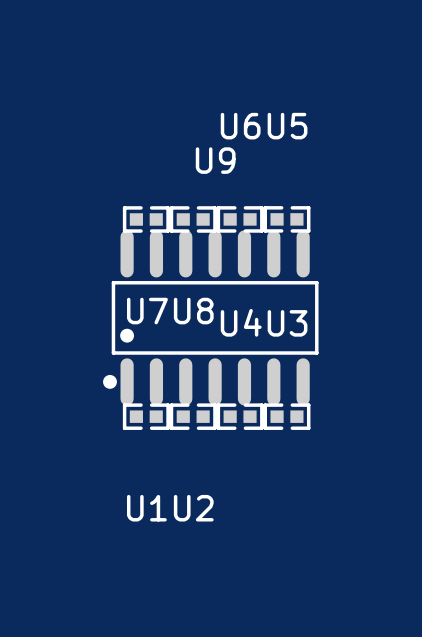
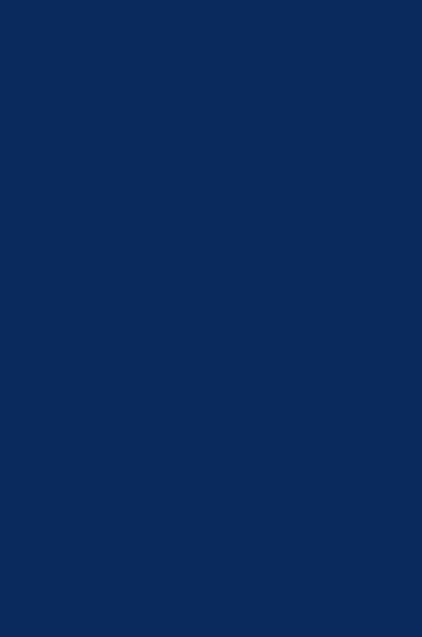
U7: (146, 219) -> none
U8: (193, 219) -> none
U6: (240, 219) -> none
U5: (286, 219) -> none
U9: (210, 317) -> none
U1: (146, 416) -> none
U2: (193, 416) -> none
U4: (240, 416) -> none
U3: (286, 416) -> none

